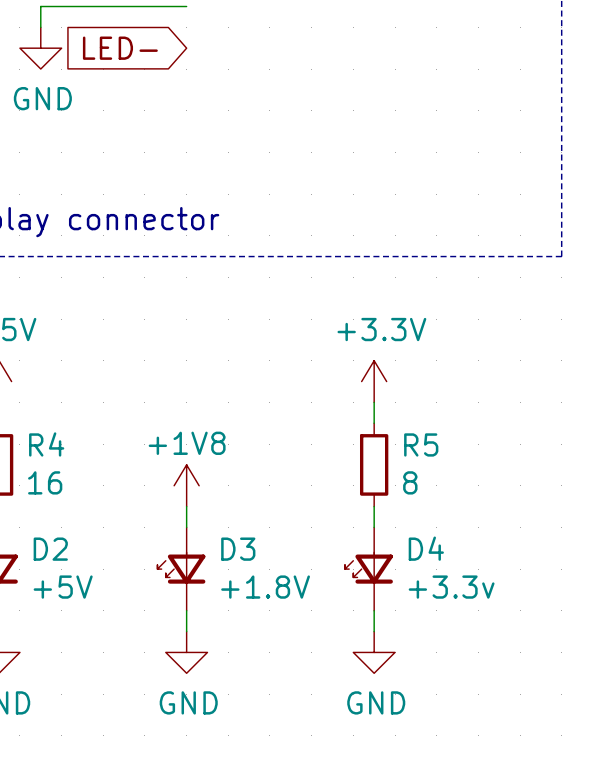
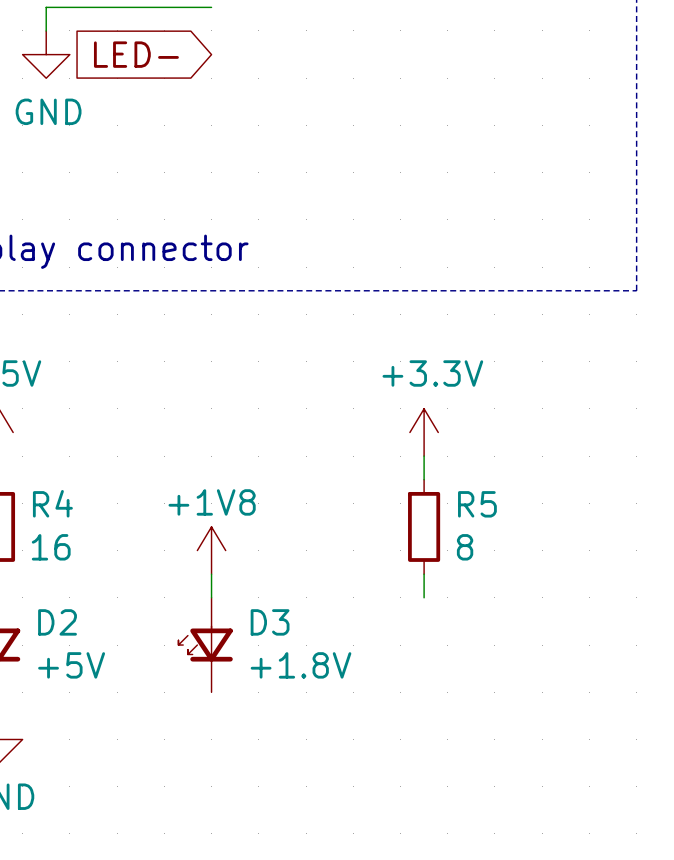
D4: +3.3v (368, 569) -> none
wire: (186, 610) (186, 631) -> none
wire: (374, 610) (374, 631) -> none
power symbol: GND (186, 652) -> none
power symbol: GND (374, 652) -> none

